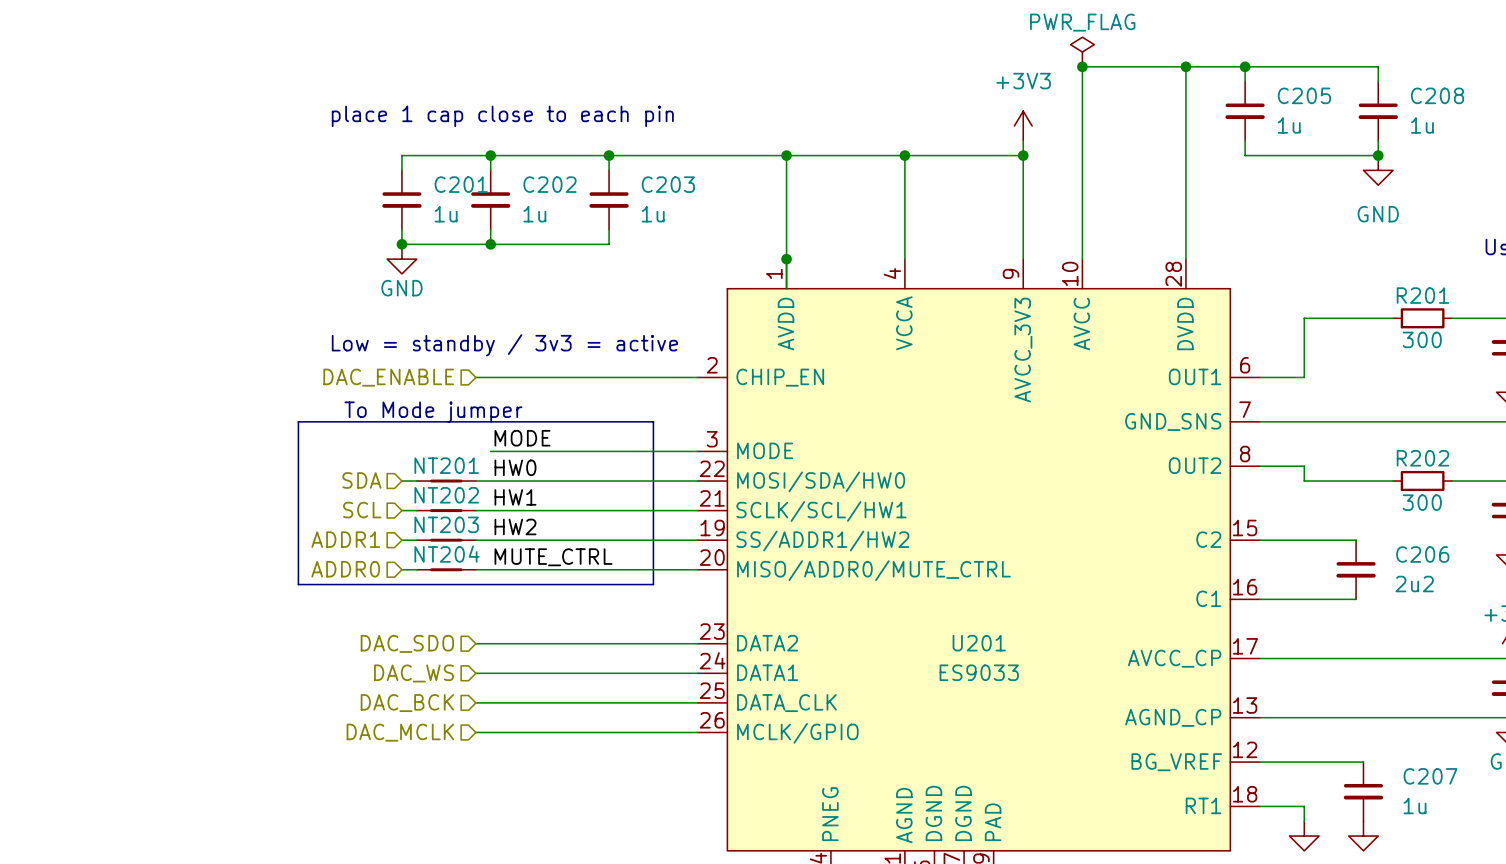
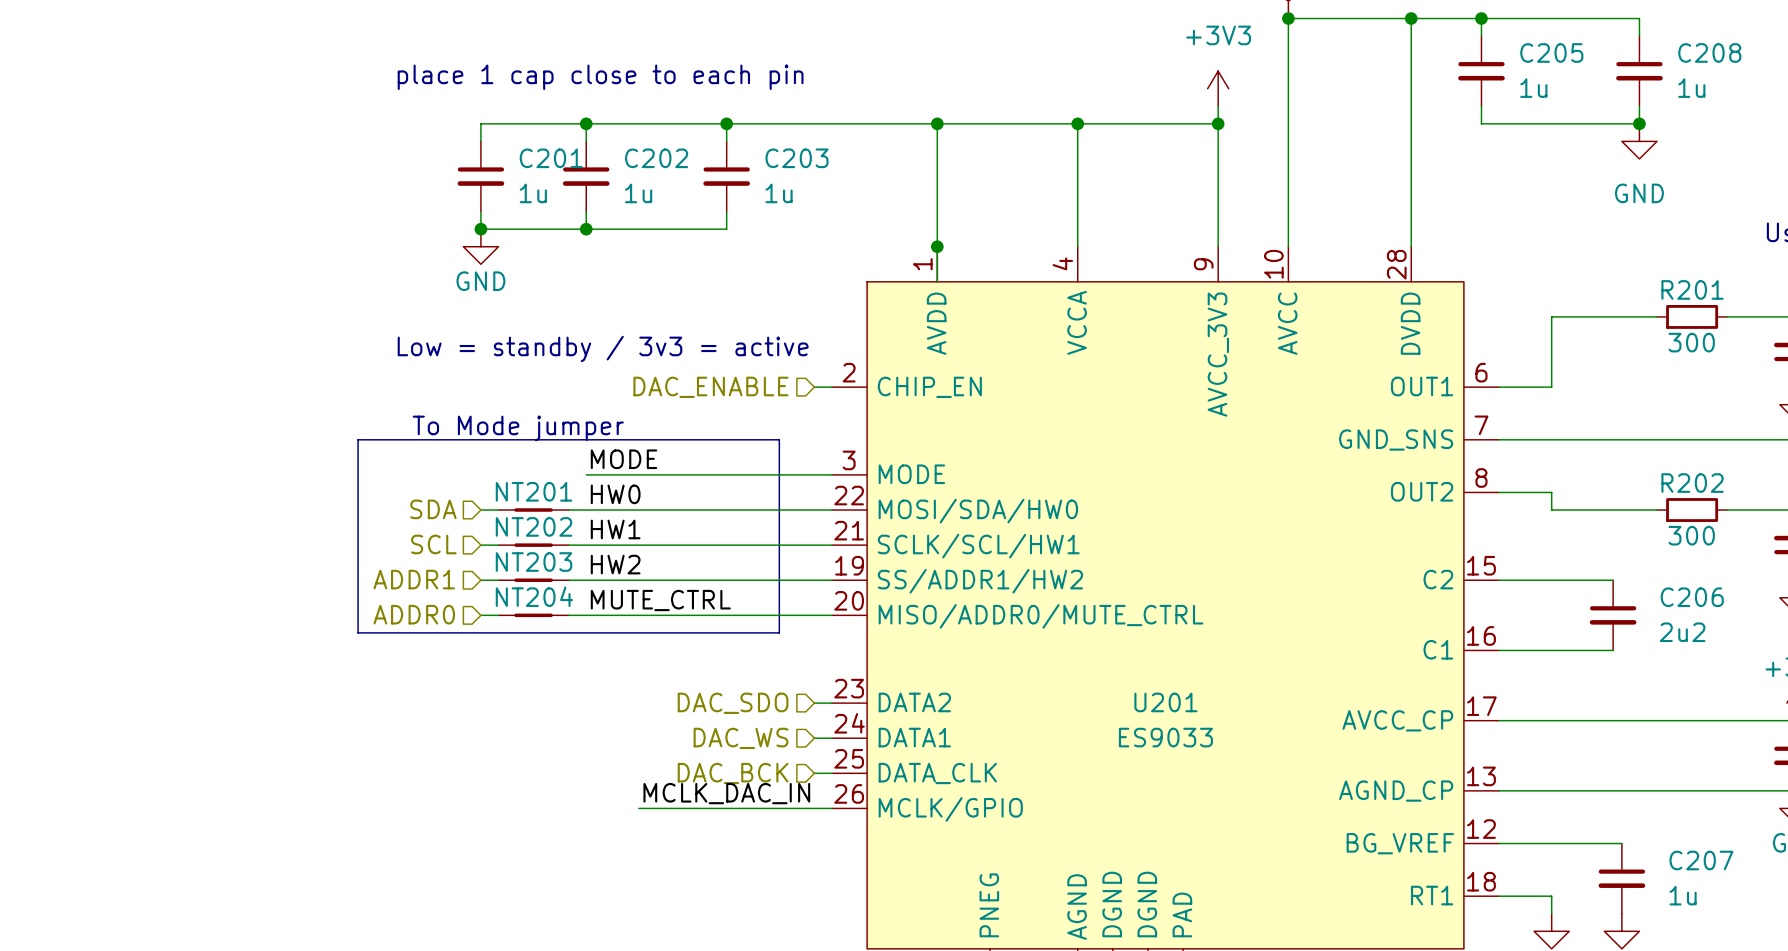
hierarchical label position: DAC_ENABLE (388, 377) -> DAC_ENABLE (710, 387)
wire: (475, 377) (683, 377) -> none
hierarchical label position: DAC_SDO (407, 643) -> DAC_SDO (733, 703)
wire: (475, 643) (683, 643) -> none
hierarchical label position: DAC_WS (414, 673) -> DAC_WS (741, 738)
wire: (475, 673) (683, 673) -> none
wire: (475, 702) (683, 702) -> none
hierarchical label position: DAC_BCK (407, 703) -> DAC_BCK (733, 773)
label: none -> MCLK_DAC_IN (726, 793)
hierarchical label: DAC_MCLK (400, 732) -> none
wire: (475, 732) (535, 732) -> none

